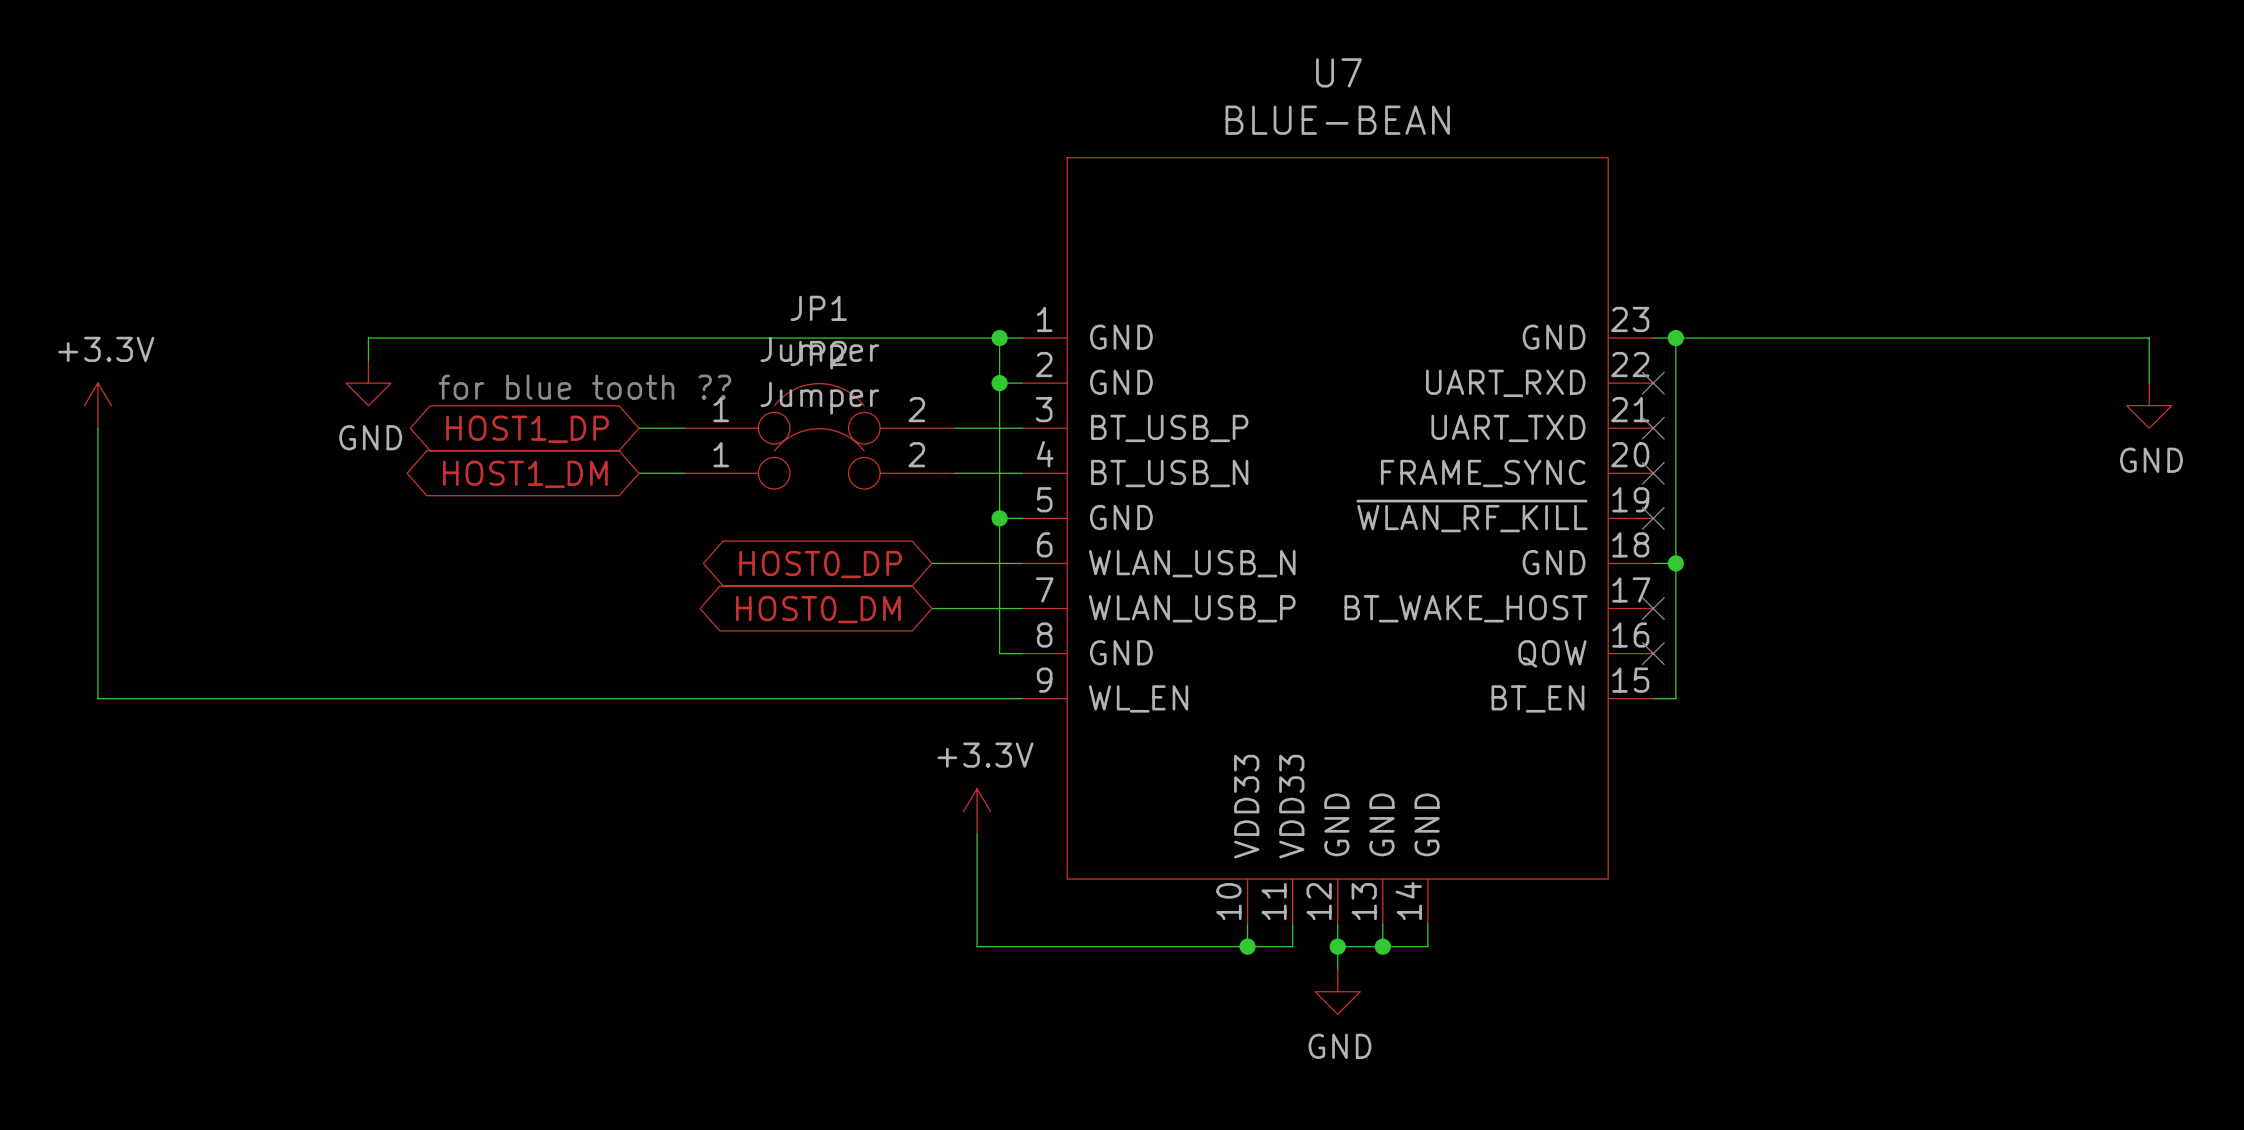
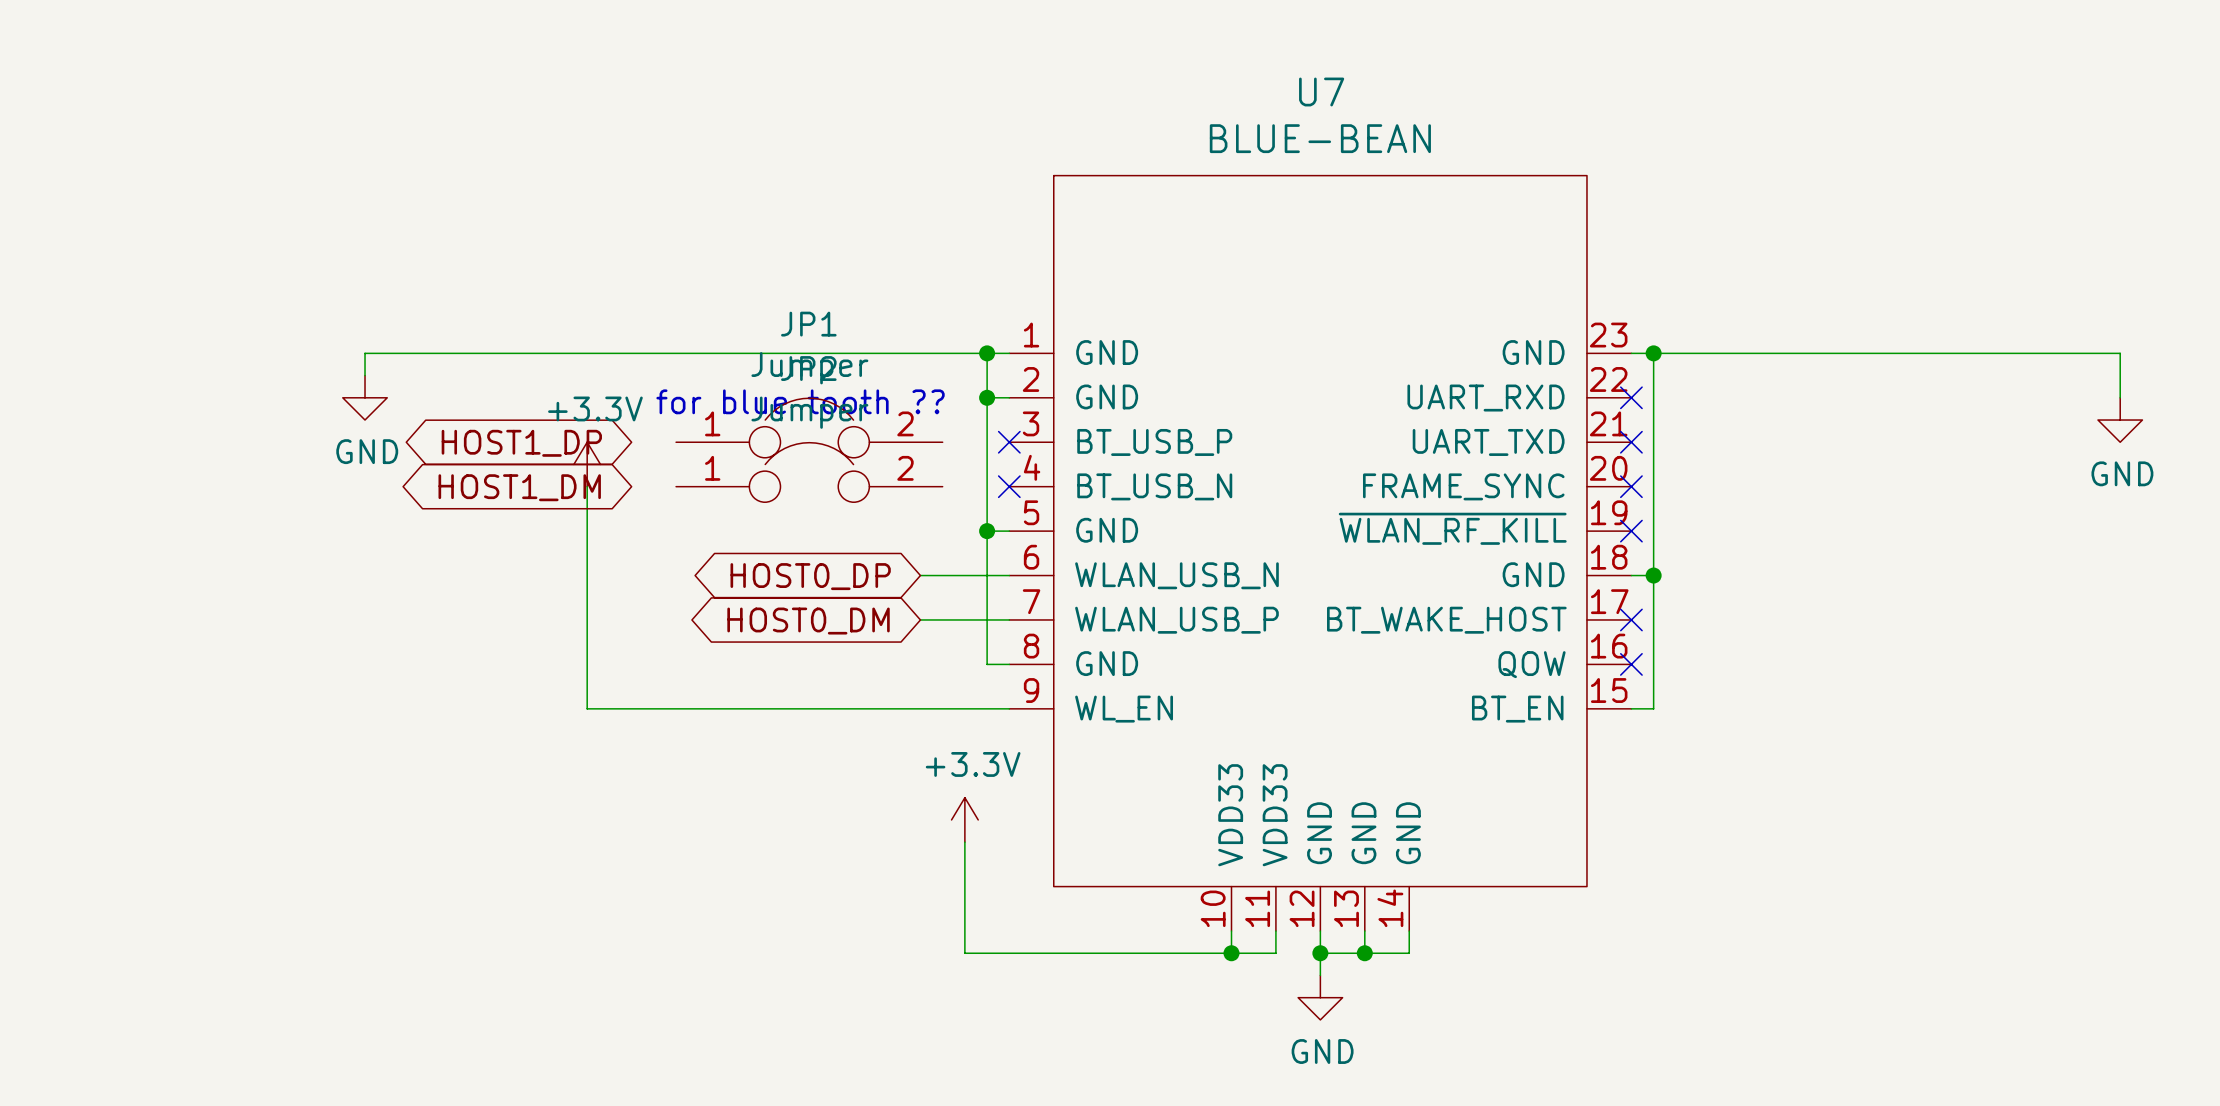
text position: for blue tooth ?? (584, 387) -> for blue tooth ?? (800, 401)
power symbol: +3.3V (97, 405) -> none
wire: (97, 428) (97, 698) (593, 698) -> (587, 486) (587, 708)
wire: (638, 428) (684, 428) -> none
wire: (954, 428) (1022, 428) -> none
no-connect mark: none -> (1009, 442)
power symbol: none -> +3.3V (587, 464)
wire: (638, 473) (684, 473) -> none
wire: (954, 473) (1022, 473) -> none
no-connect mark: none -> (1009, 486)

